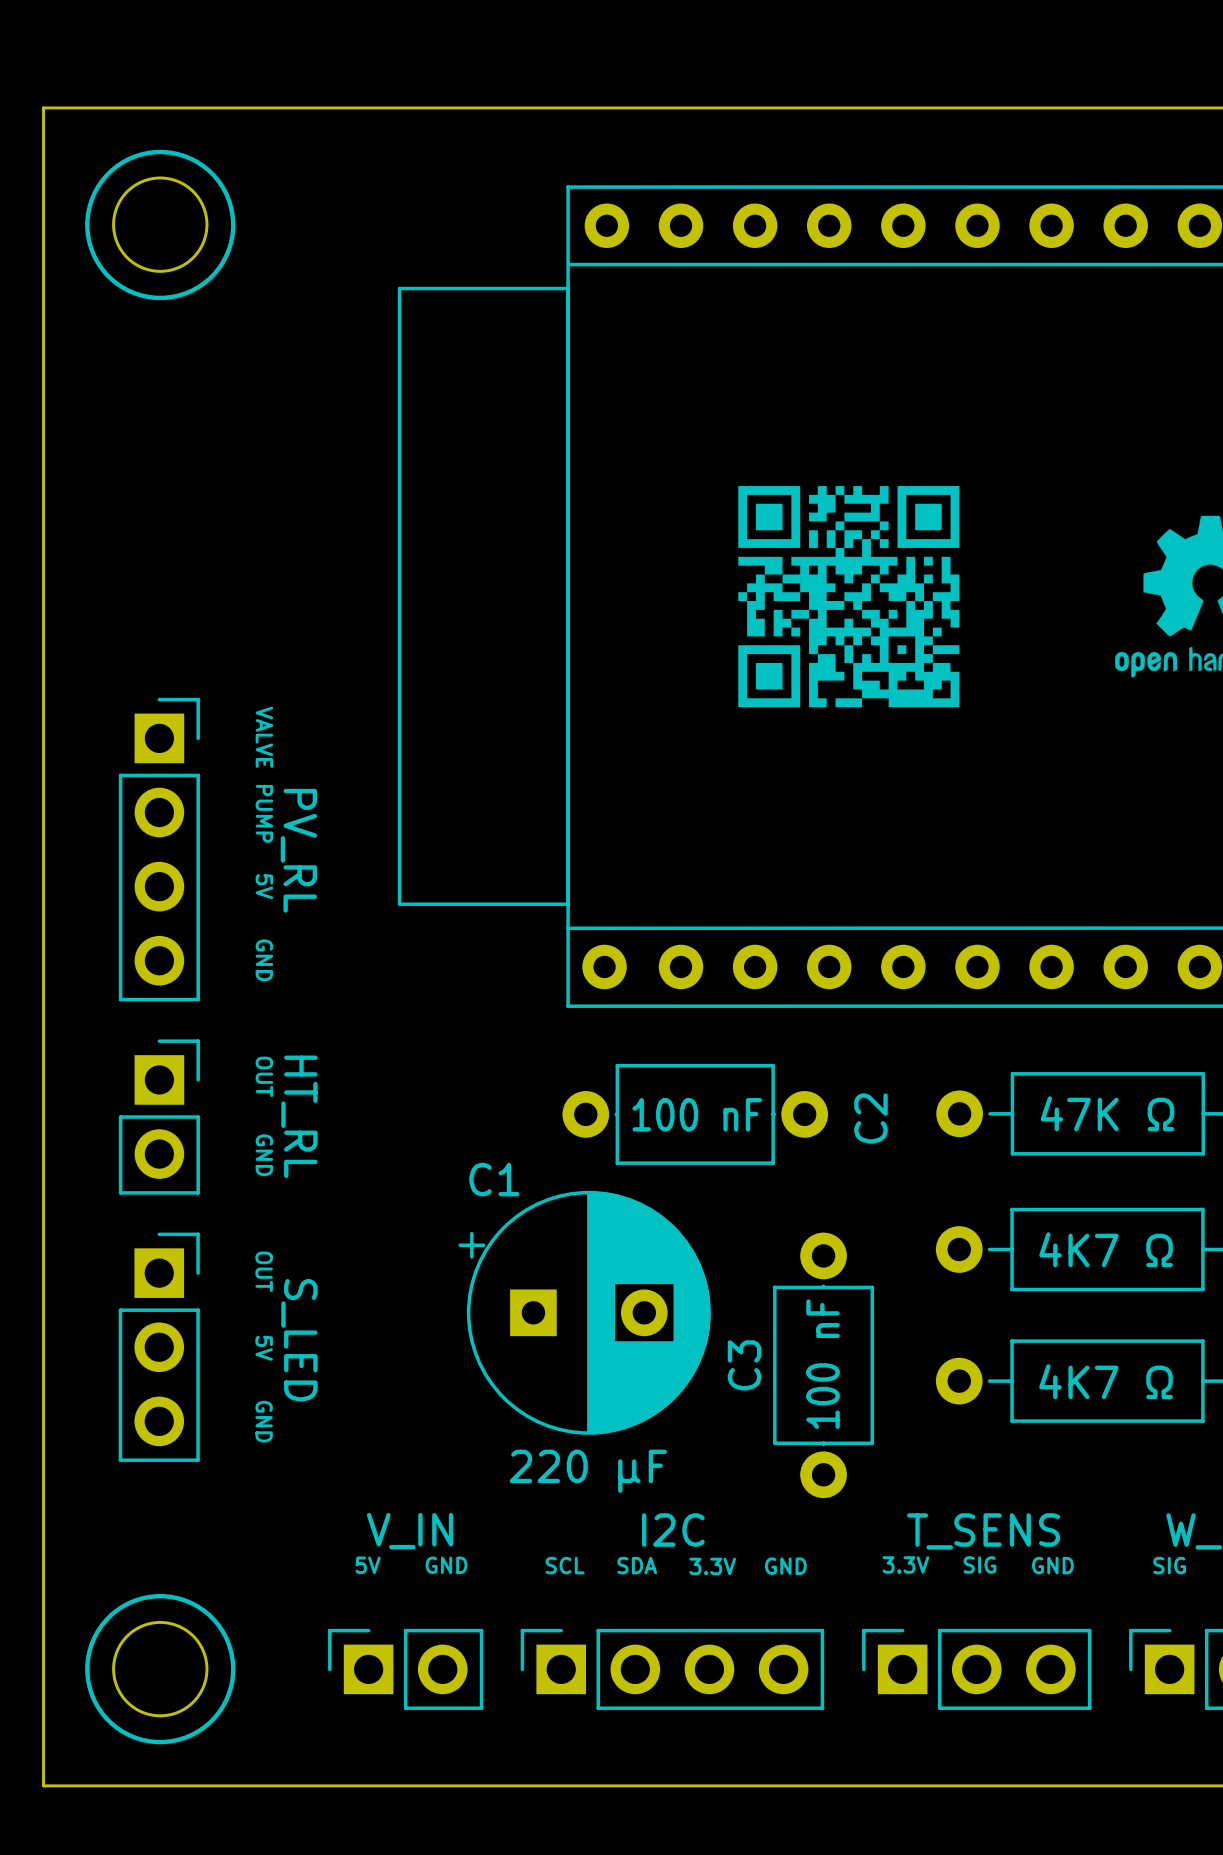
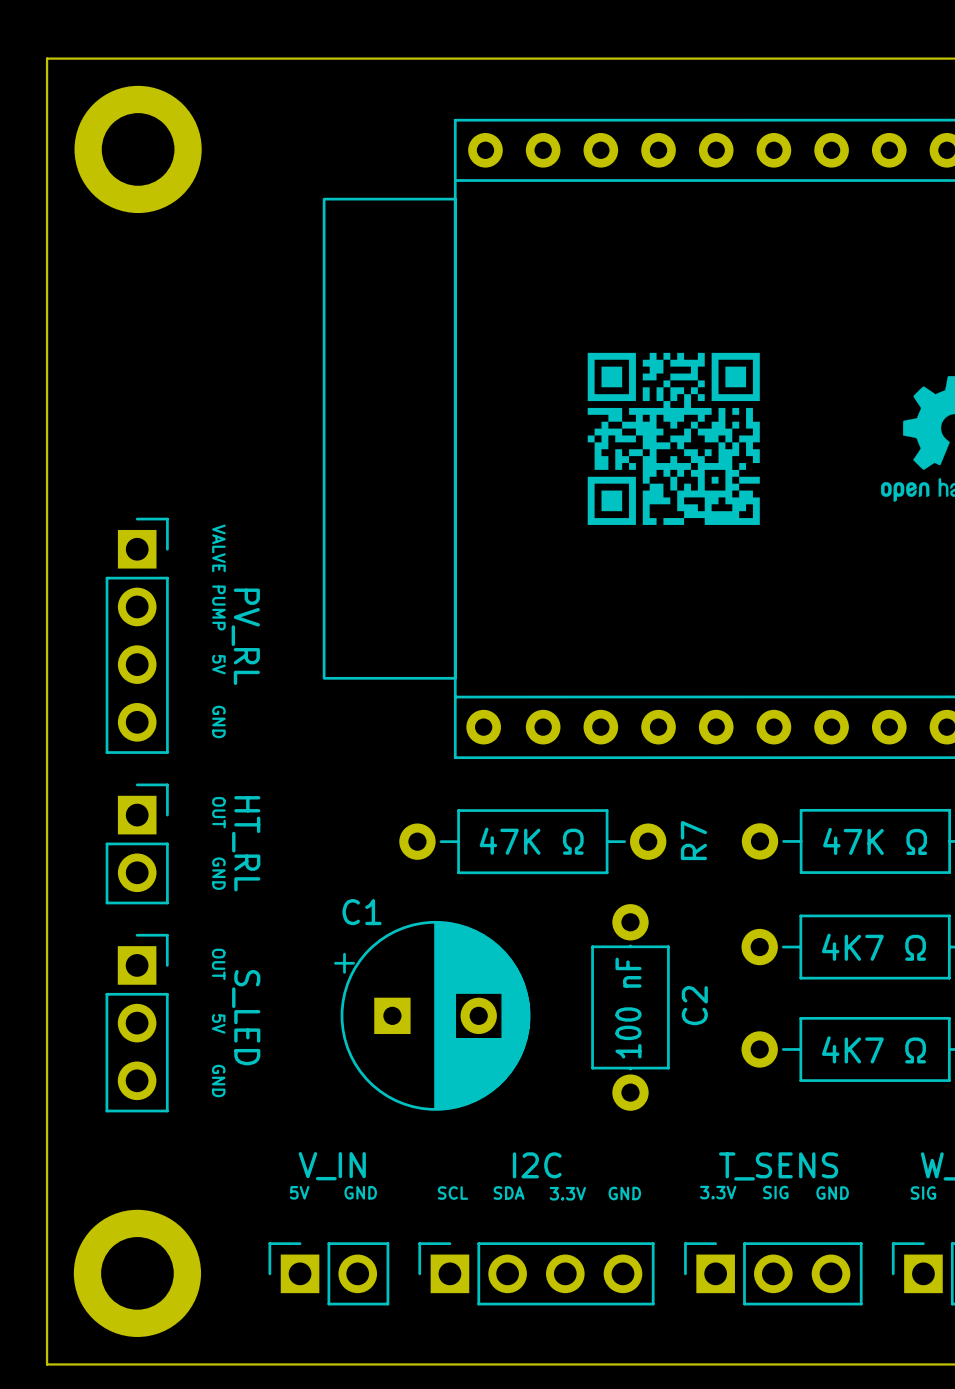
drawing: [85, 149, 236, 301] -> none
round board edge: [112, 176, 209, 273] -> none
part: none -> (138, 149)
R7: none -> 47K Ω (532, 841)
C2 rotation: 0° (695, 1114) -> 90° clockwise (630, 1007)
C2 position: (695, 1114) -> (630, 1007)
C2 name position: C2 (870, 1118) -> C2 (694, 1005)
C1 position: (584, 1312) -> (432, 1015)
C3: 100 nF (823, 1365) -> none
C1 value: 220 μF (588, 1471) -> none
drawing: [85, 1593, 236, 1745] -> none
round board edge: [112, 1620, 209, 1718] -> none
part: none -> (137, 1273)

